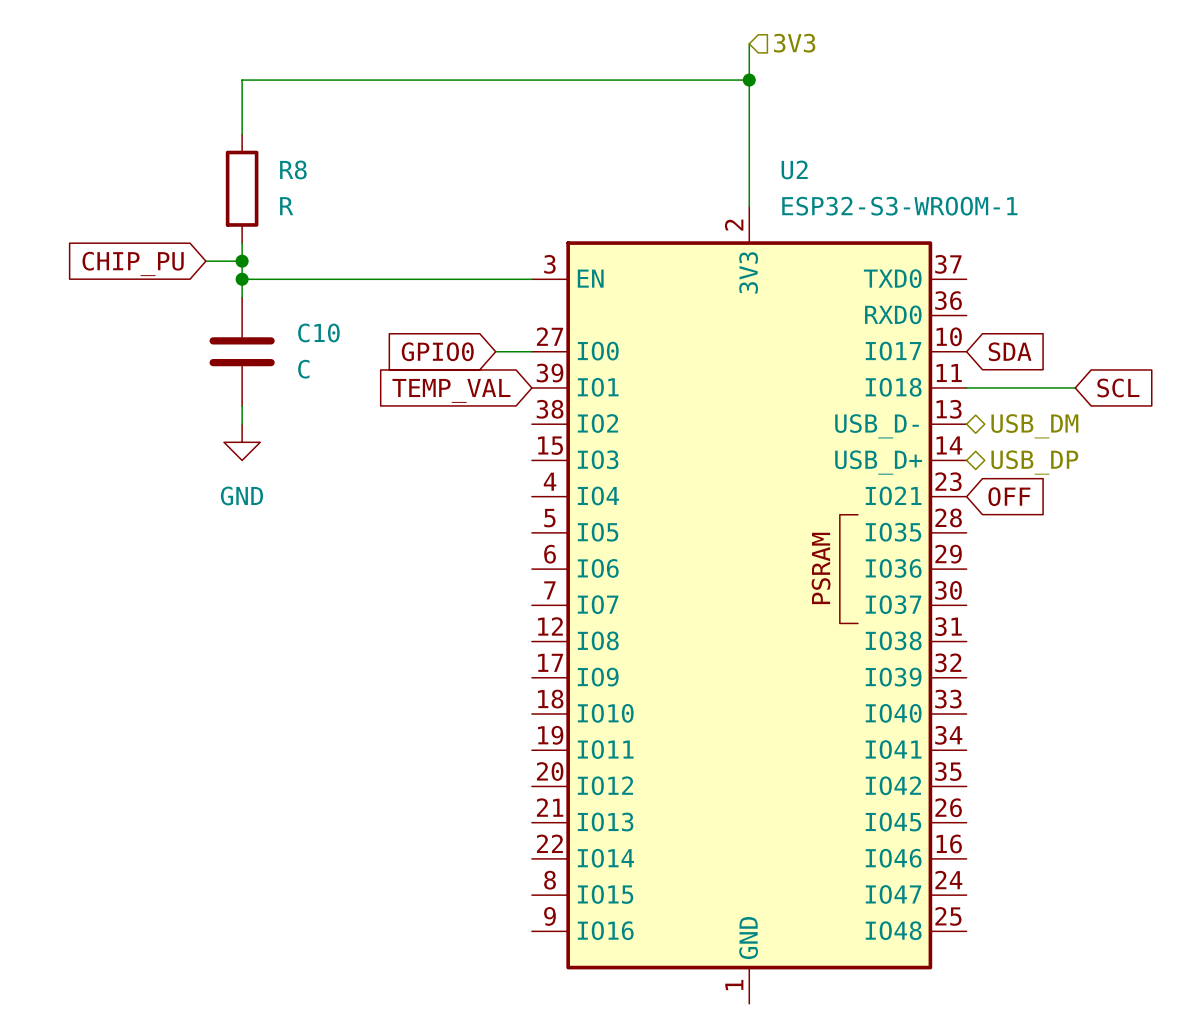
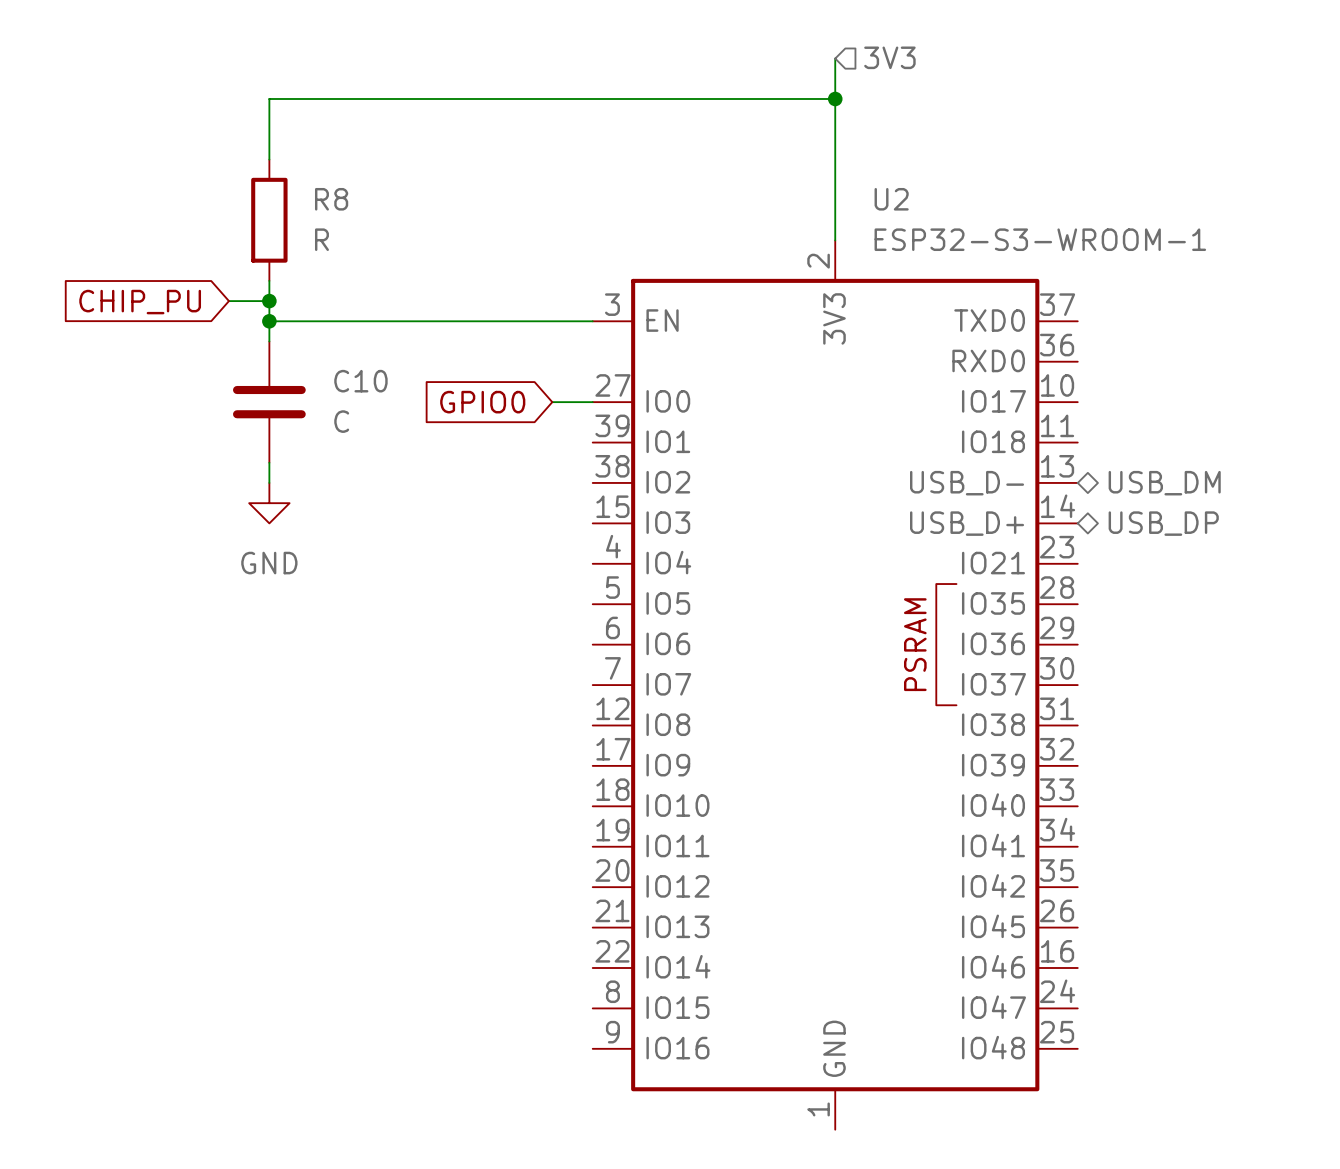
global label: SDA (1010, 351) -> none
wire: (966, 387) (1075, 387) -> none
global label: SCL (1118, 387) -> none
global label: TEMP_VAL (451, 390) -> none
global label: OFF (1009, 496) -> none

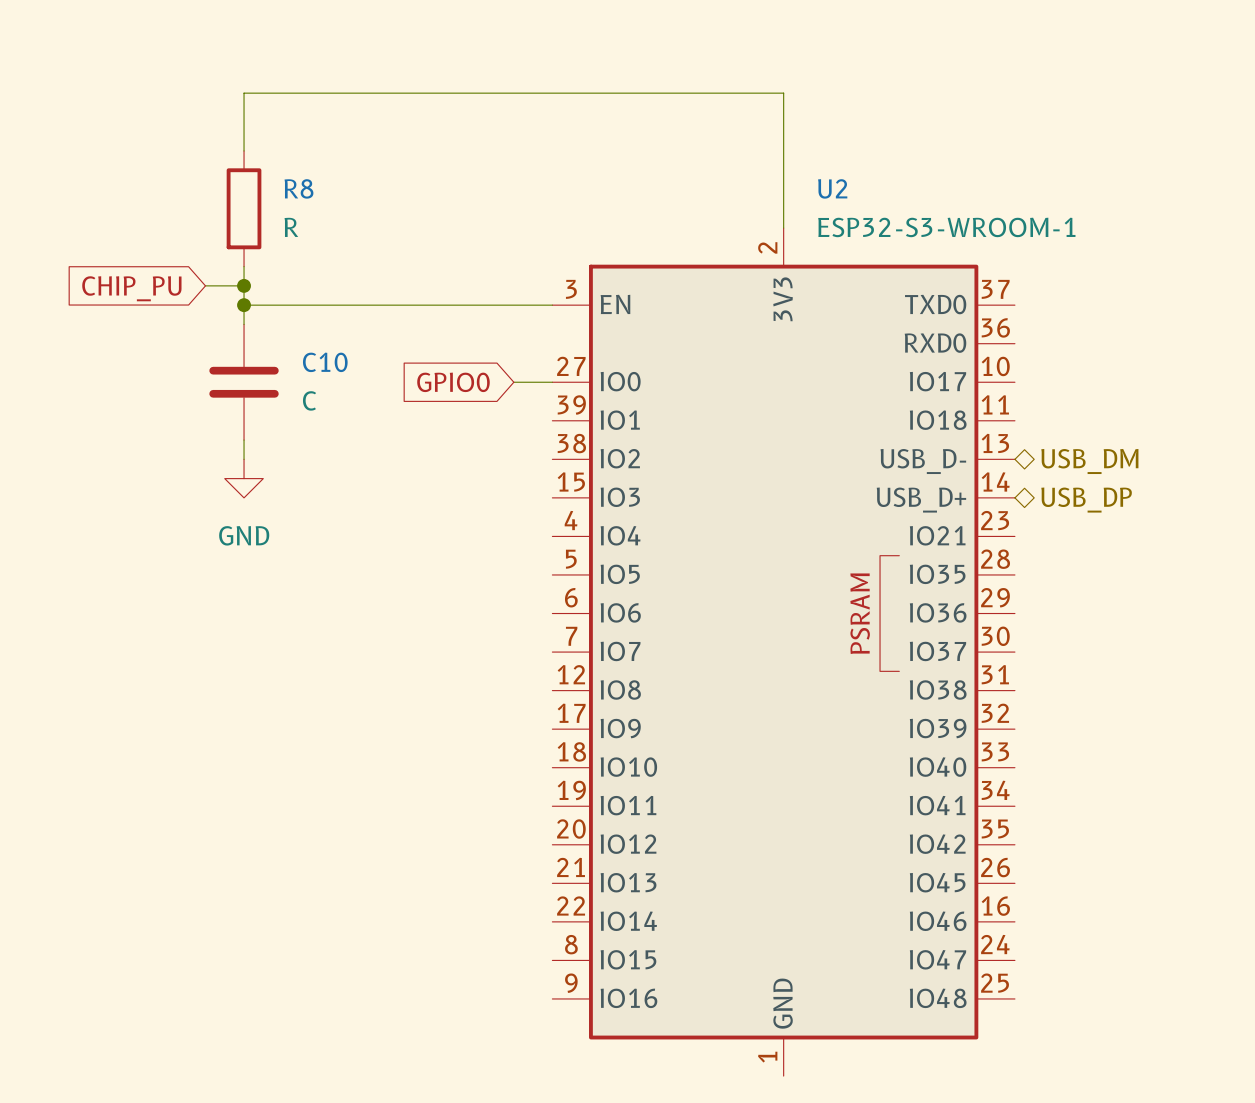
hierarchical label: 3V3 (889, 57) -> none
wire: (835, 58) (835, 98) -> none
junction: (835, 98) -> none

